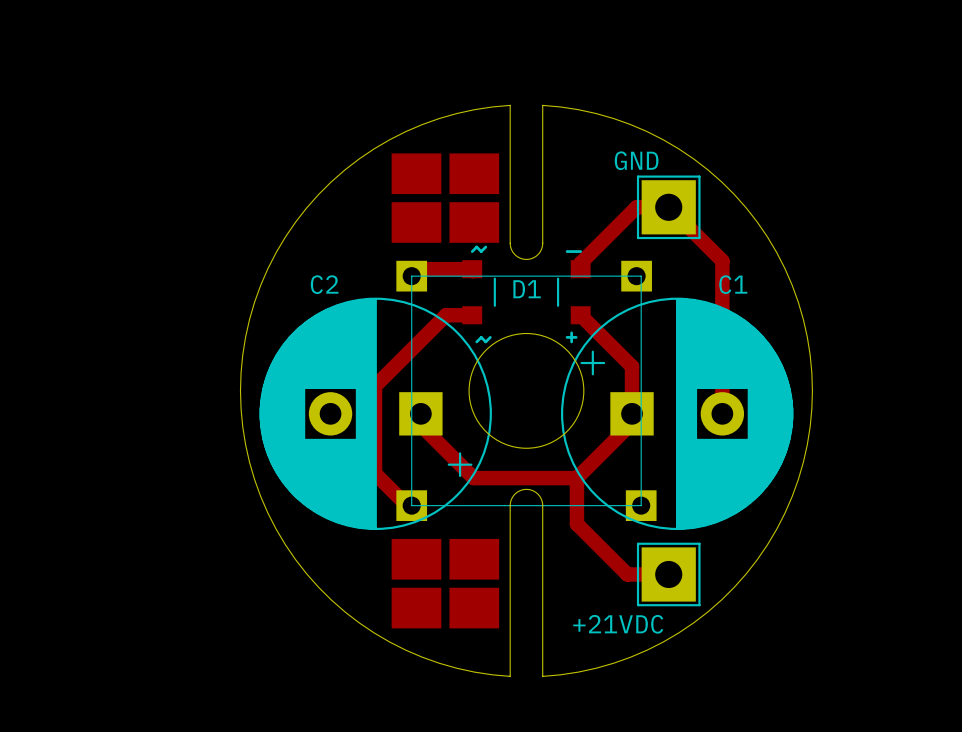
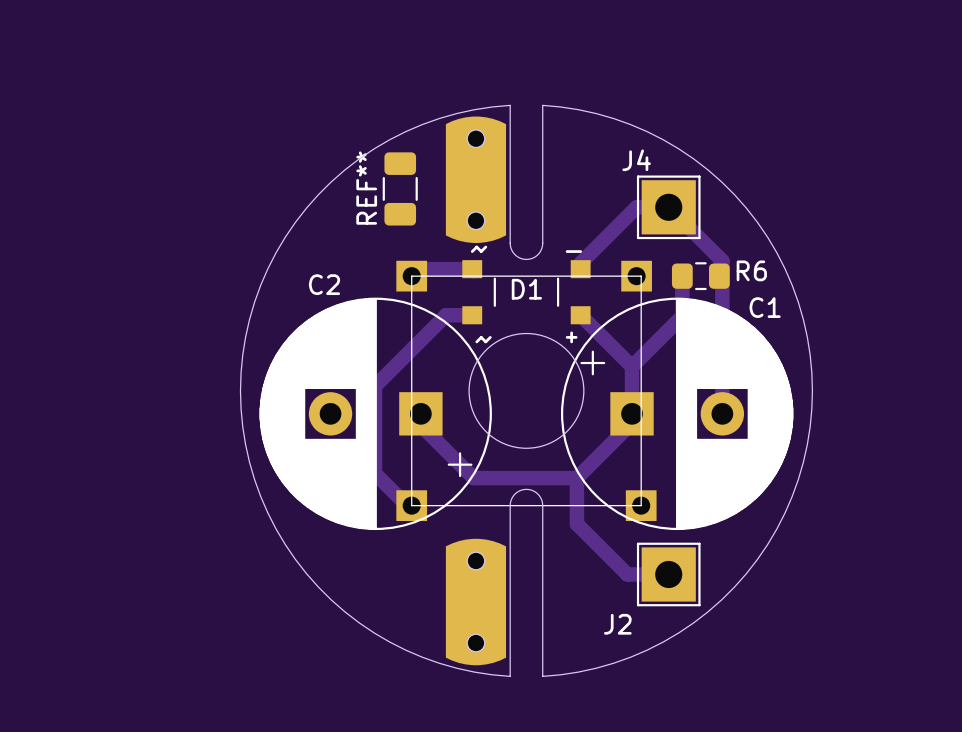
GND name: GND (636, 160) -> J4 (636, 160)
part: none -> (475, 179)
REF**: none -> (400, 188)
part: (445, 198) -> none
track: none -> (682, 276) (682, 316) (632, 366)
R6: none -> (700, 276)
C1 name position: C1 (733, 284) -> C1 (765, 307)
part: (445, 583) -> none
part: none -> (475, 602)
+21VDC name: +21VDC (618, 624) -> J2 (617, 624)

